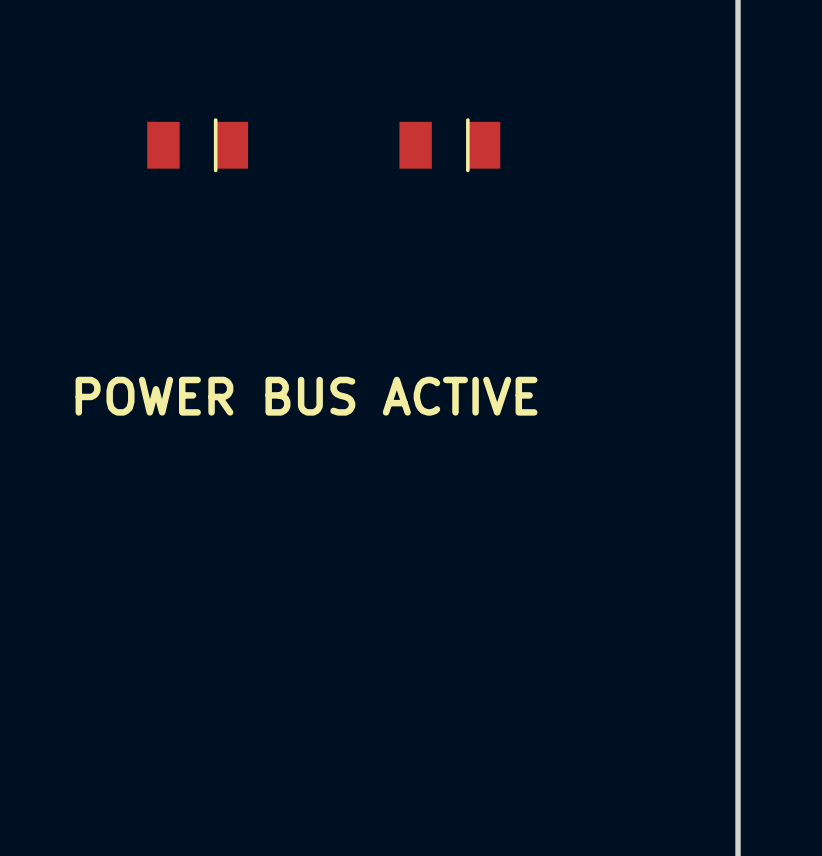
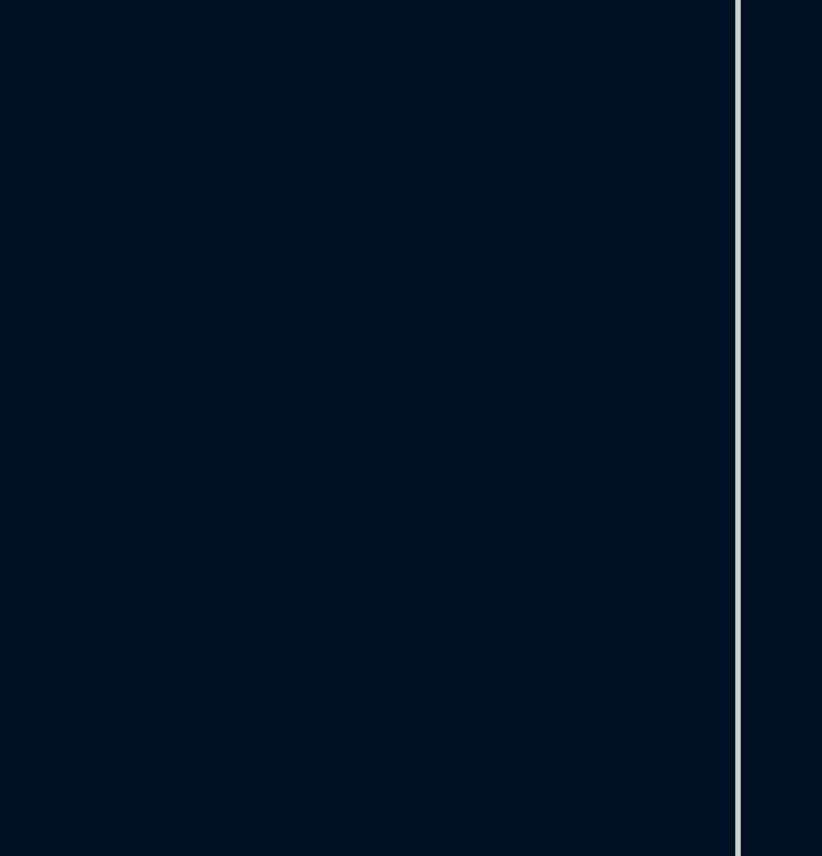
part: (197, 145) -> none
part: (449, 145) -> none
text: POWER BUS ACTIVE (306, 396) -> none

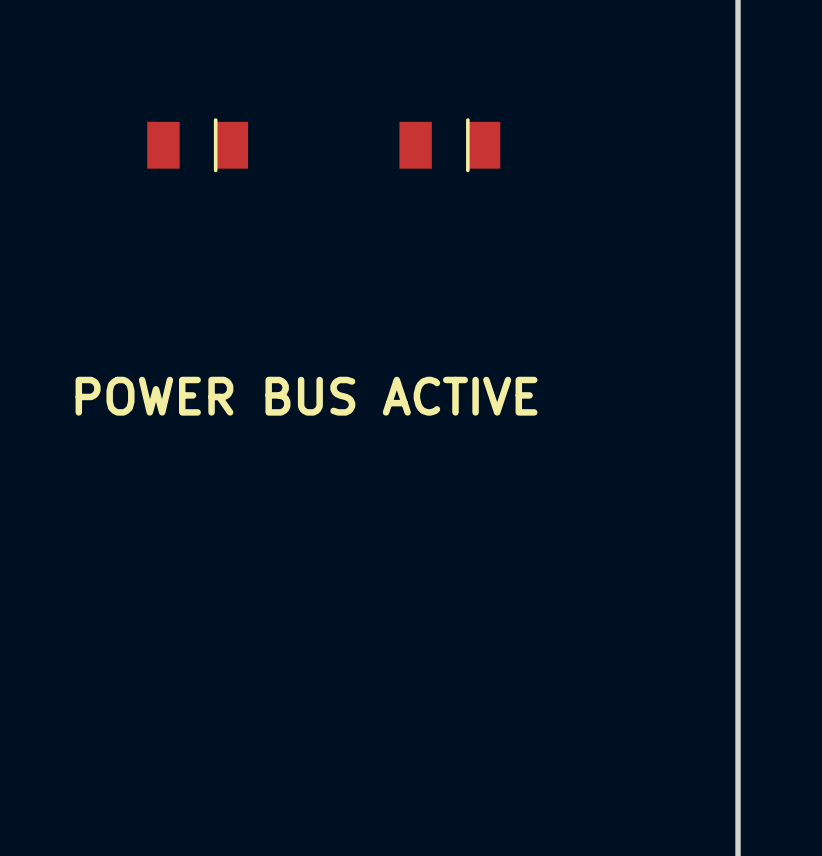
part: none -> (197, 145)
part: none -> (449, 145)
text: none -> POWER BUS ACTIVE (306, 396)

